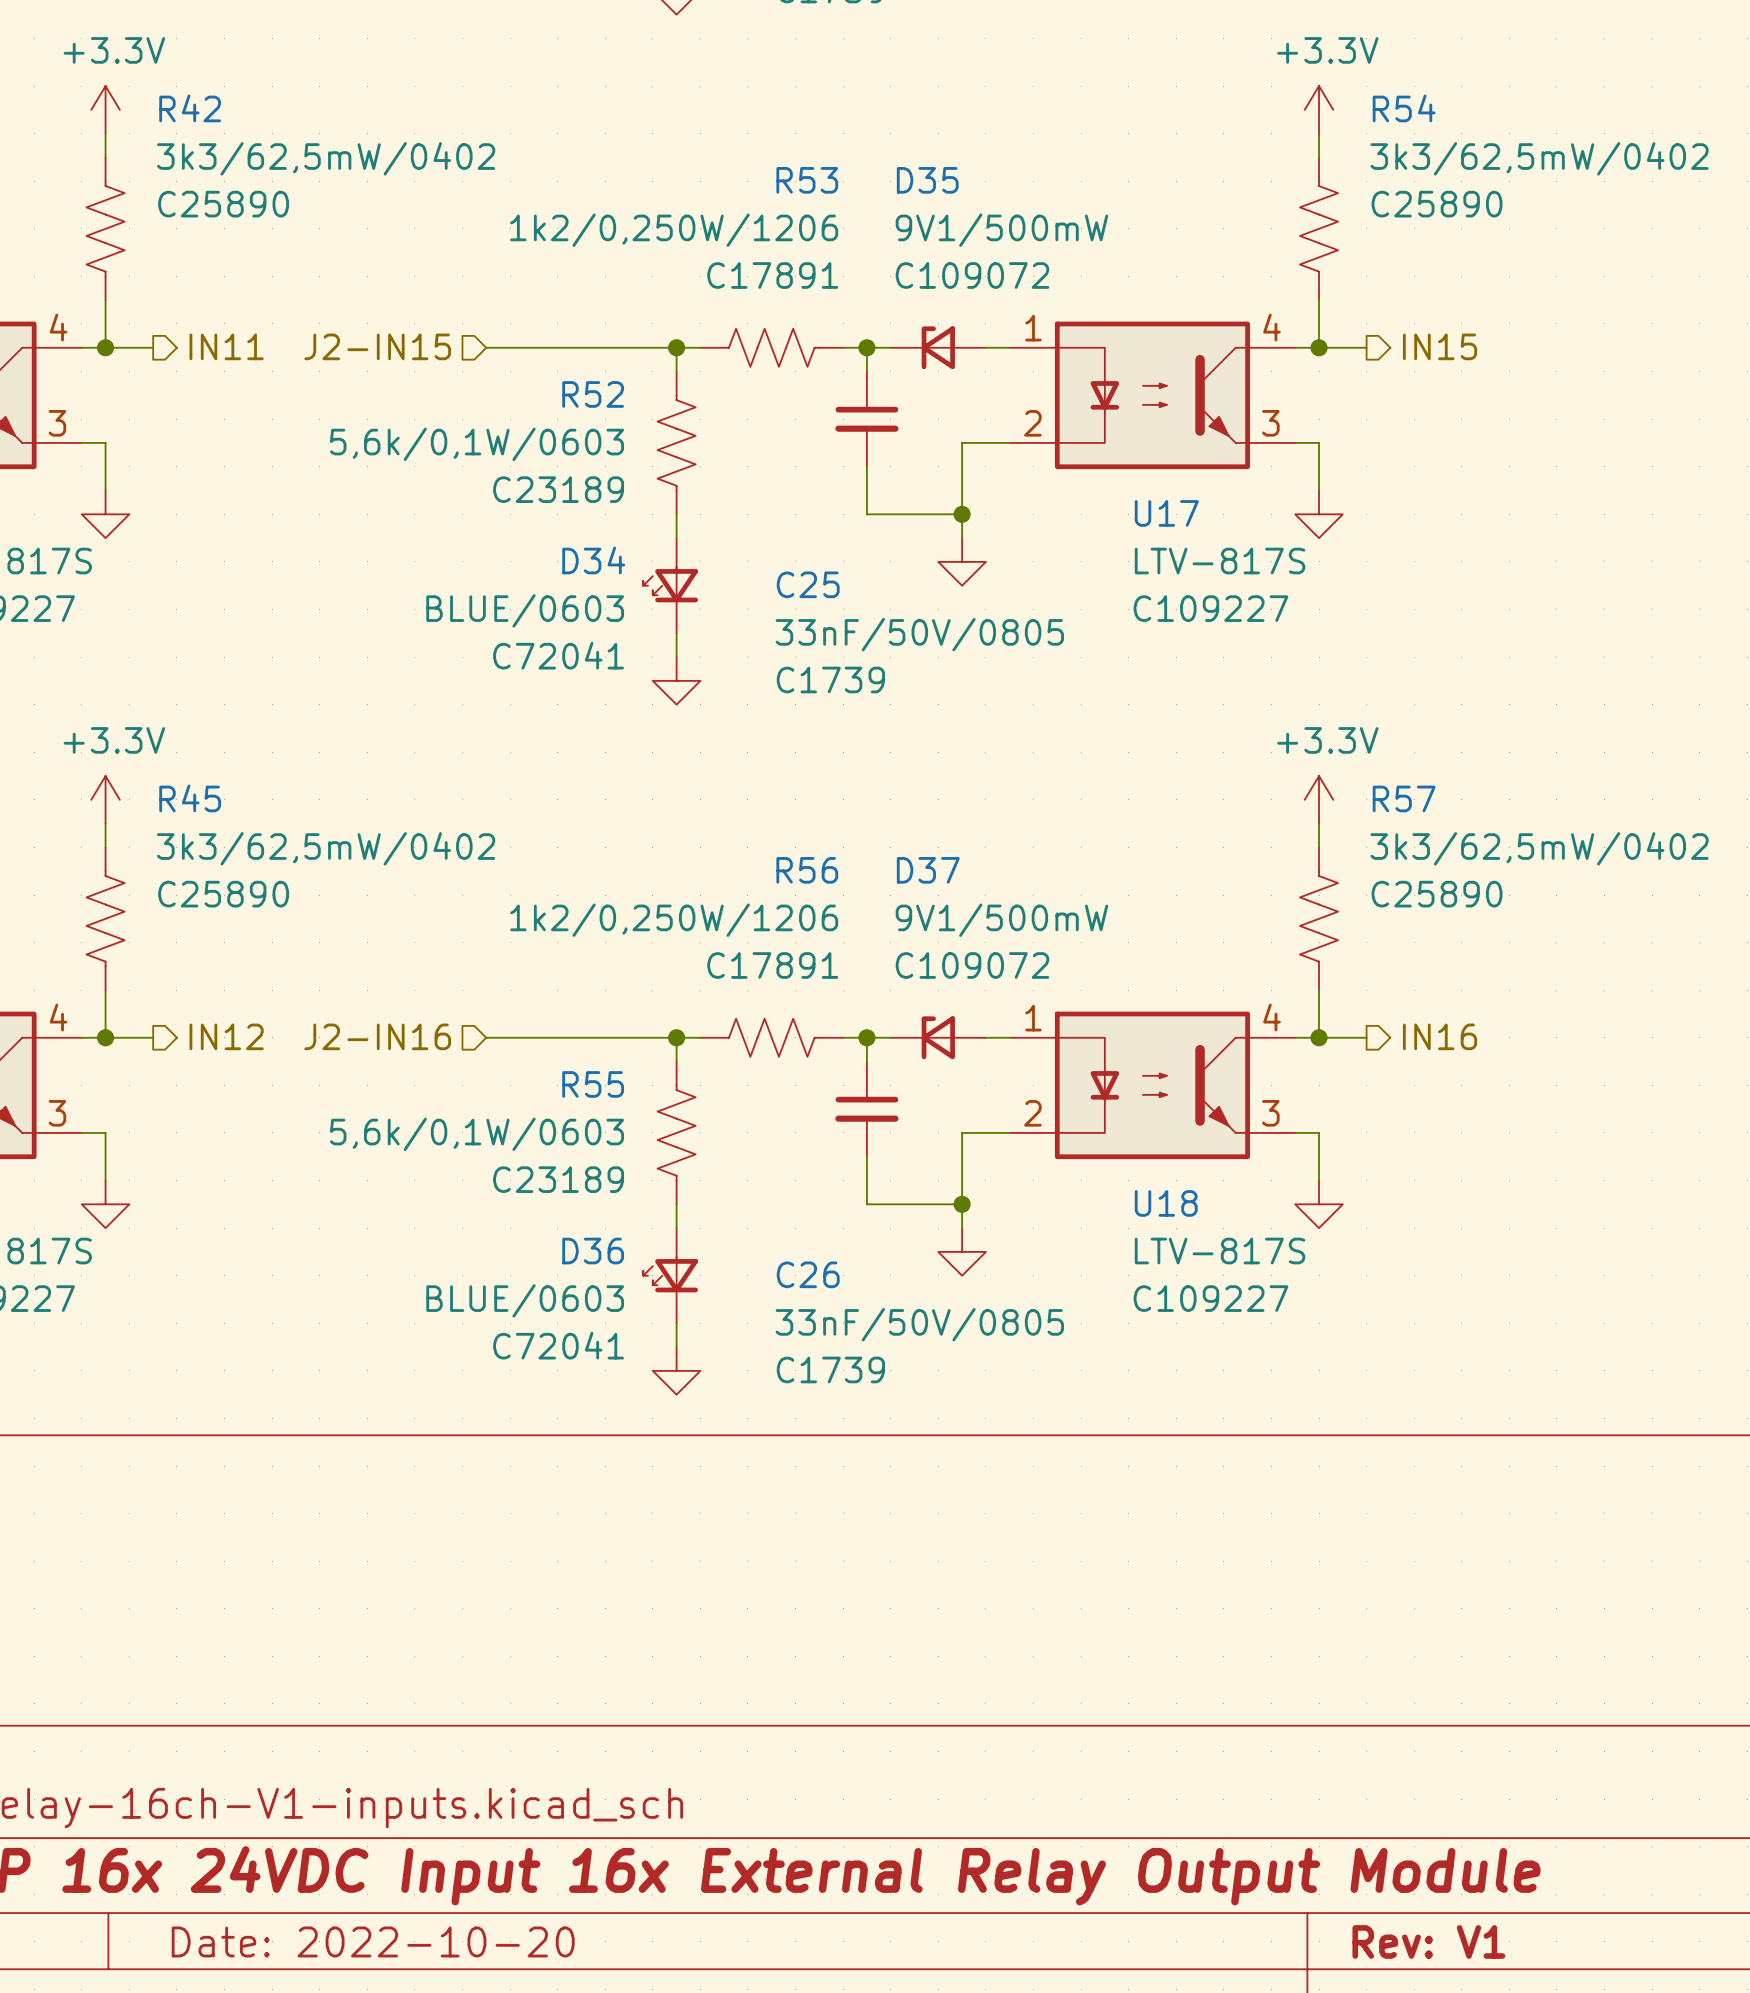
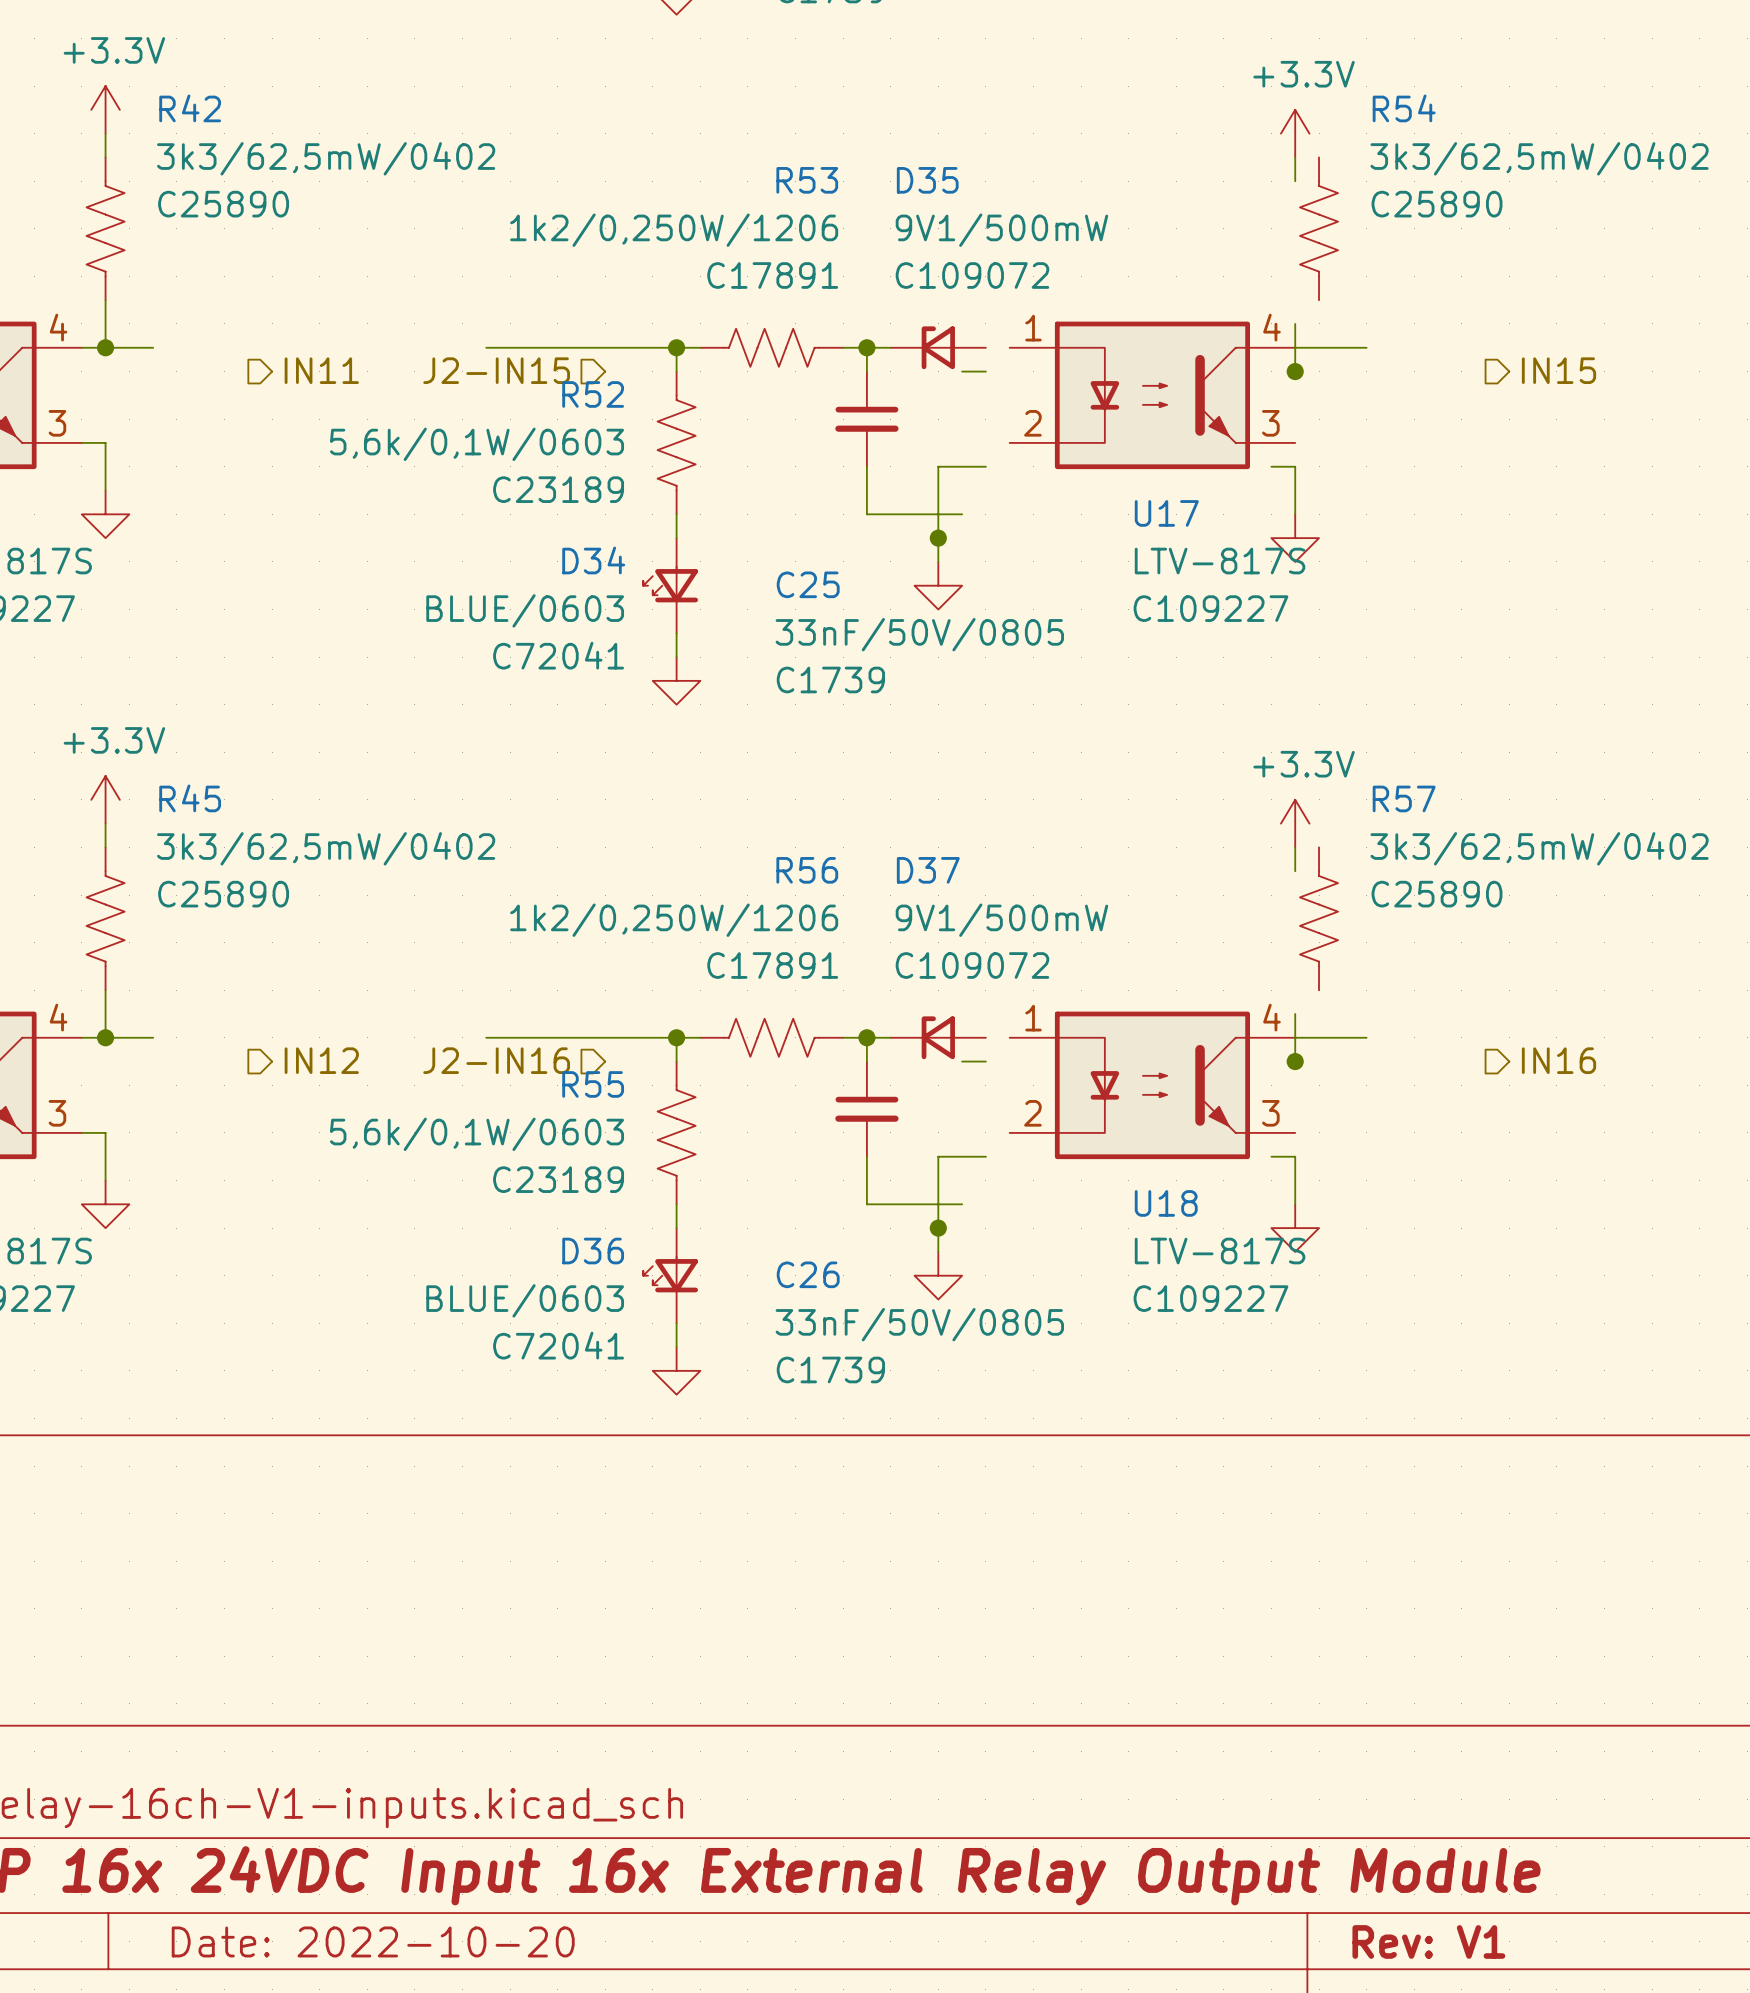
power symbol position: +3.3V (1319, 109) -> +3.3V (1295, 133)
wire: (1319, 133) (1319, 157) -> (1295, 157) (1295, 181)
wire: (1319, 300) (1319, 347) -> (1295, 323) (1295, 371)
hierarchical label position: IN11 (226, 346) -> IN11 (321, 370)
hierarchical label position: J2-IN15 (377, 346) -> J2-IN15 (496, 370)
hierarchical label position: IN15 (1440, 346) -> IN15 (1559, 370)
wire: (985, 347) (1009, 347) -> (962, 371) (985, 371)
junction position: (1319, 347) -> (1295, 371)
wire: (1009, 442) (962, 442) (962, 538) -> (985, 466) (938, 466) (938, 561)
wire: (1295, 442) (1319, 442) (1319, 490) -> (1271, 466) (1295, 466) (1295, 514)
junction position: (962, 514) -> (938, 538)
power symbol position: (1319, 514) -> (1295, 538)
power symbol position: (962, 561) -> (938, 585)
power symbol position: +3.3V (1319, 799) -> +3.3V (1295, 823)
wire: (1319, 823) (1319, 847) -> (1295, 847) (1295, 871)
wire: (1319, 990) (1319, 1037) -> (1295, 1013) (1295, 1061)
hierarchical label position: IN12 (226, 1036) -> IN12 (321, 1060)
hierarchical label position: J2-IN16 (377, 1036) -> J2-IN16 (496, 1060)
hierarchical label position: IN16 (1440, 1036) -> IN16 (1559, 1060)
wire: (985, 1037) (1009, 1037) -> (962, 1061) (985, 1061)
junction position: (1319, 1037) -> (1295, 1061)
wire: (1009, 1132) (962, 1132) (962, 1228) -> (985, 1156) (938, 1156) (938, 1251)
wire: (1295, 1132) (1319, 1132) (1319, 1180) -> (1271, 1156) (1295, 1156) (1295, 1204)
junction position: (962, 1204) -> (938, 1228)
power symbol position: (1319, 1204) -> (1295, 1228)
power symbol position: (962, 1251) -> (938, 1275)

